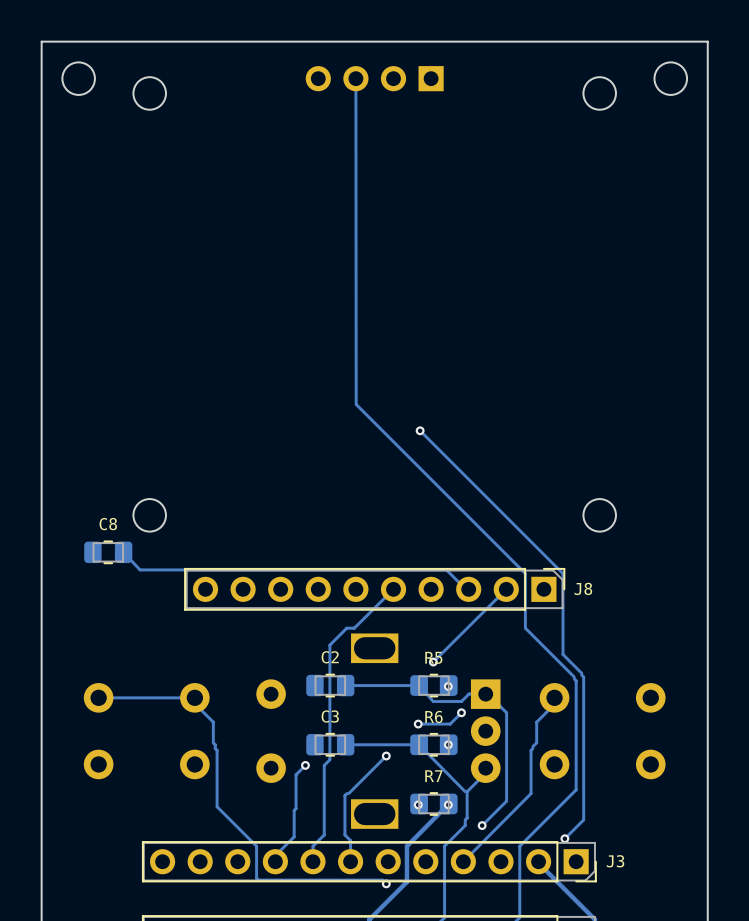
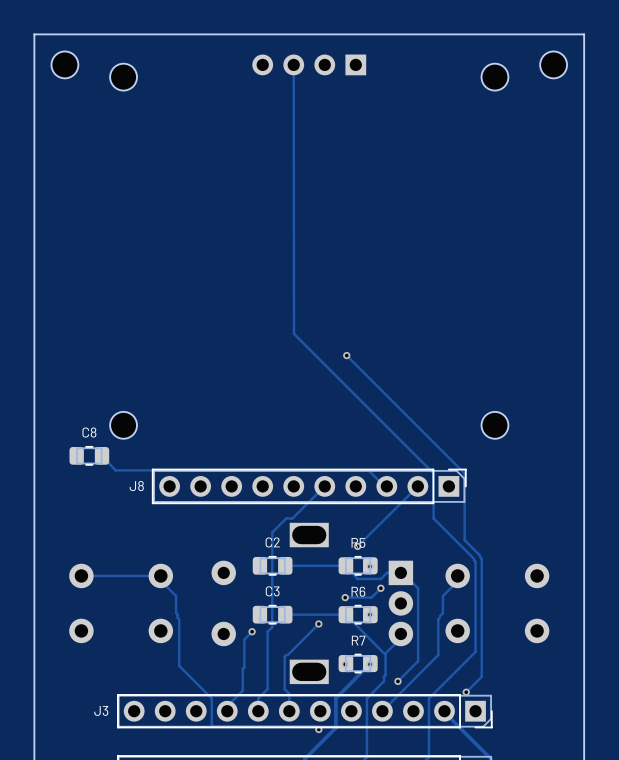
J8 name position: J8 (583, 588) -> J8 (136, 486)
J3 name position: J3 (615, 861) -> J3 (101, 710)

